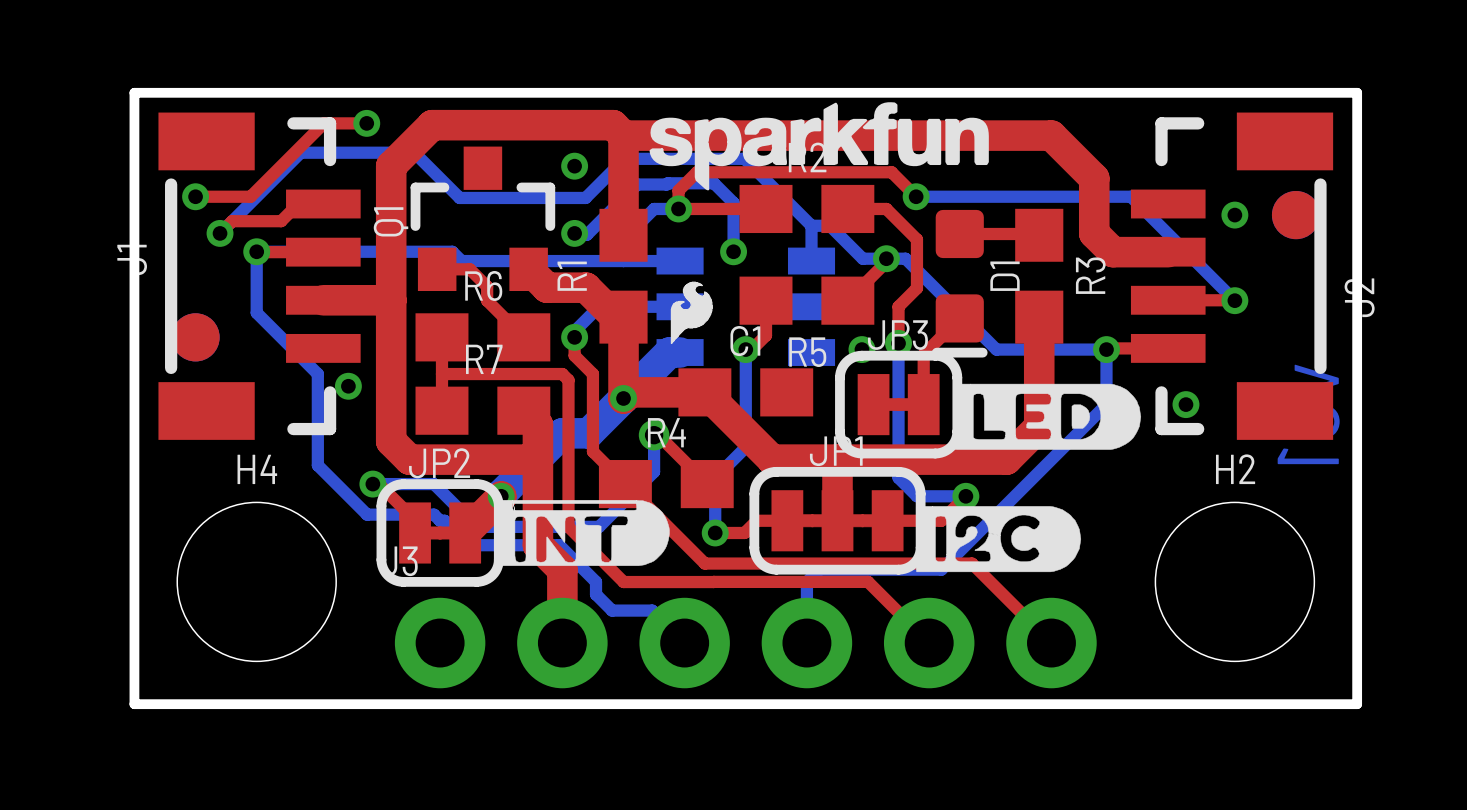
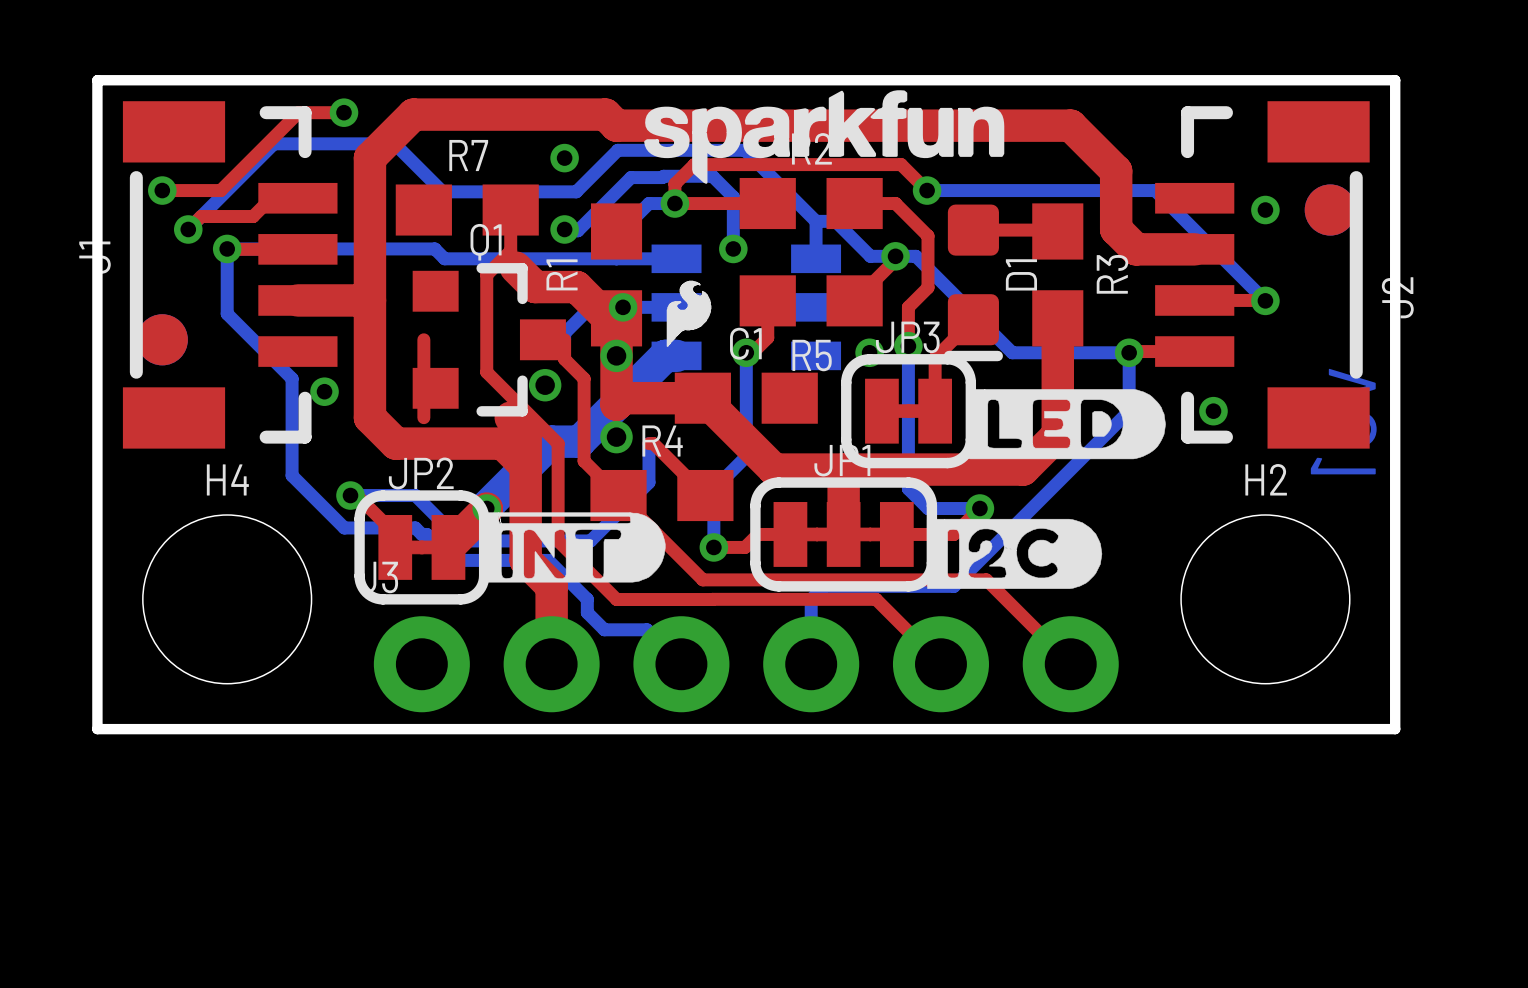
top track: (623, 135) (623, 235) -> none
Q1 rotation: 0° (482, 218) -> 90° clockwise (489, 339)
Q1 position: (482, 218) -> (489, 339)
top track: (437, 269) (469, 269) (487, 286) (487, 300) (523, 337) -> none
via: none -> (623, 307)
R6: (482, 337) -> none
via: (574, 337) -> none
via: none -> (616, 355)
top track: (441, 374) (562, 374) (568, 380) (568, 435) -> (510, 210) (510, 250) (486, 274) (486, 372) (558, 443)
via: none -> (545, 385)
via: (623, 398) -> none
top track: (391, 410) (391, 441) (409, 459) (537, 459) -> (369, 417) (395, 443) (502, 443) (525, 466)
R7 position: (482, 410) -> (467, 210)
via position: (654, 435) -> (616, 437)

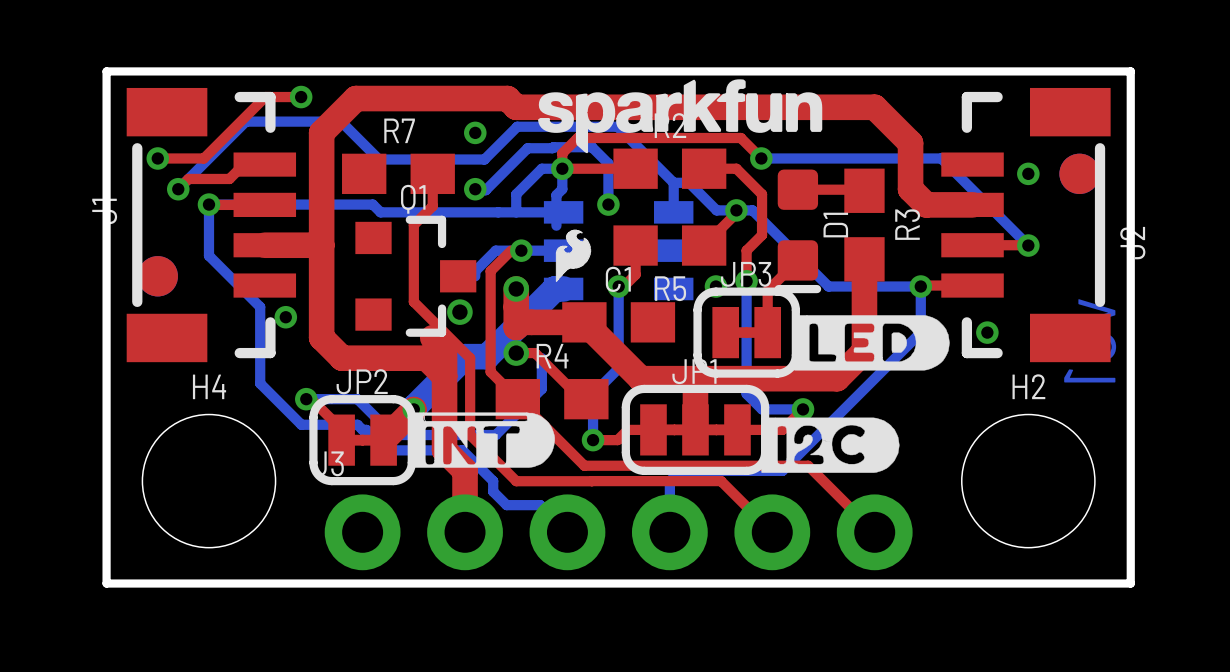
bottom track: none -> (562, 168) (562, 189) (556, 195) (556, 225)
top track: (515, 267) (535, 287) (576, 287) (608, 318) (616, 318) (616, 355) -> none
R1: (616, 274) -> none
top track: (423, 339) (423, 417) -> none
top track: (564, 339) (564, 359) (584, 378) -> (511, 250) (490, 271) (490, 306)
top track: (648, 443) (653, 443) (705, 495) -> (516, 353) (535, 353) (581, 399) (586, 399)

